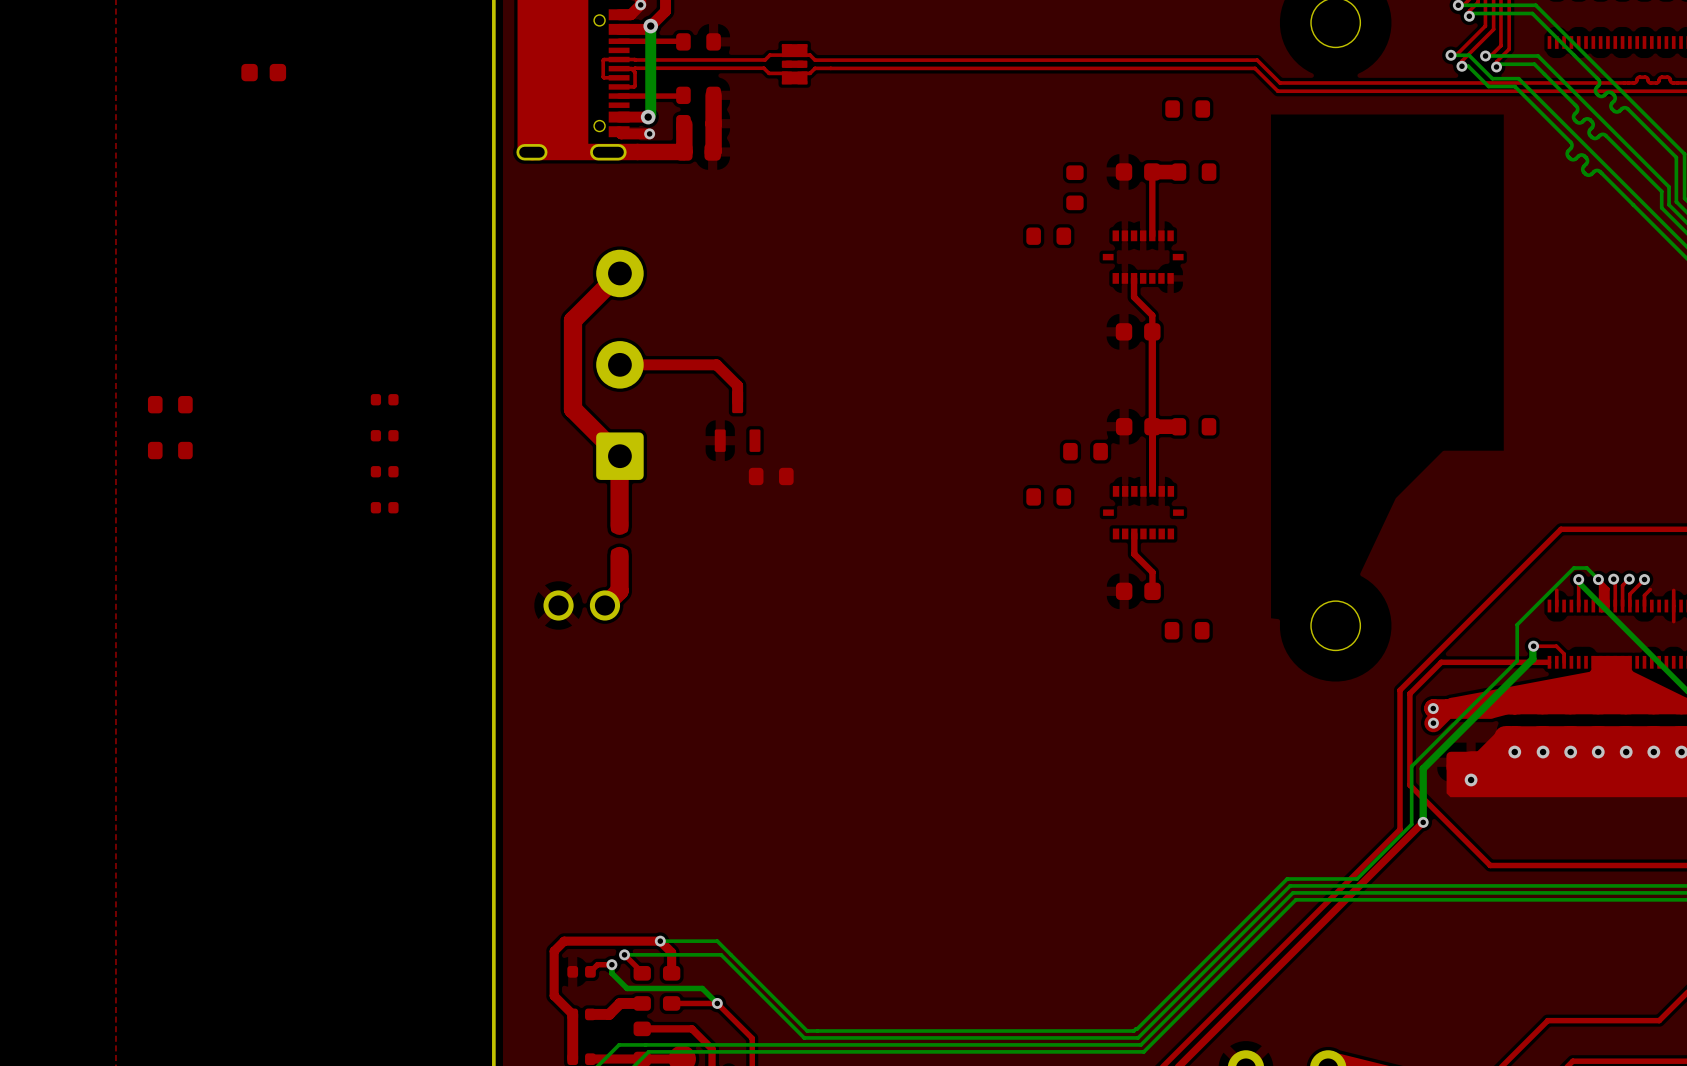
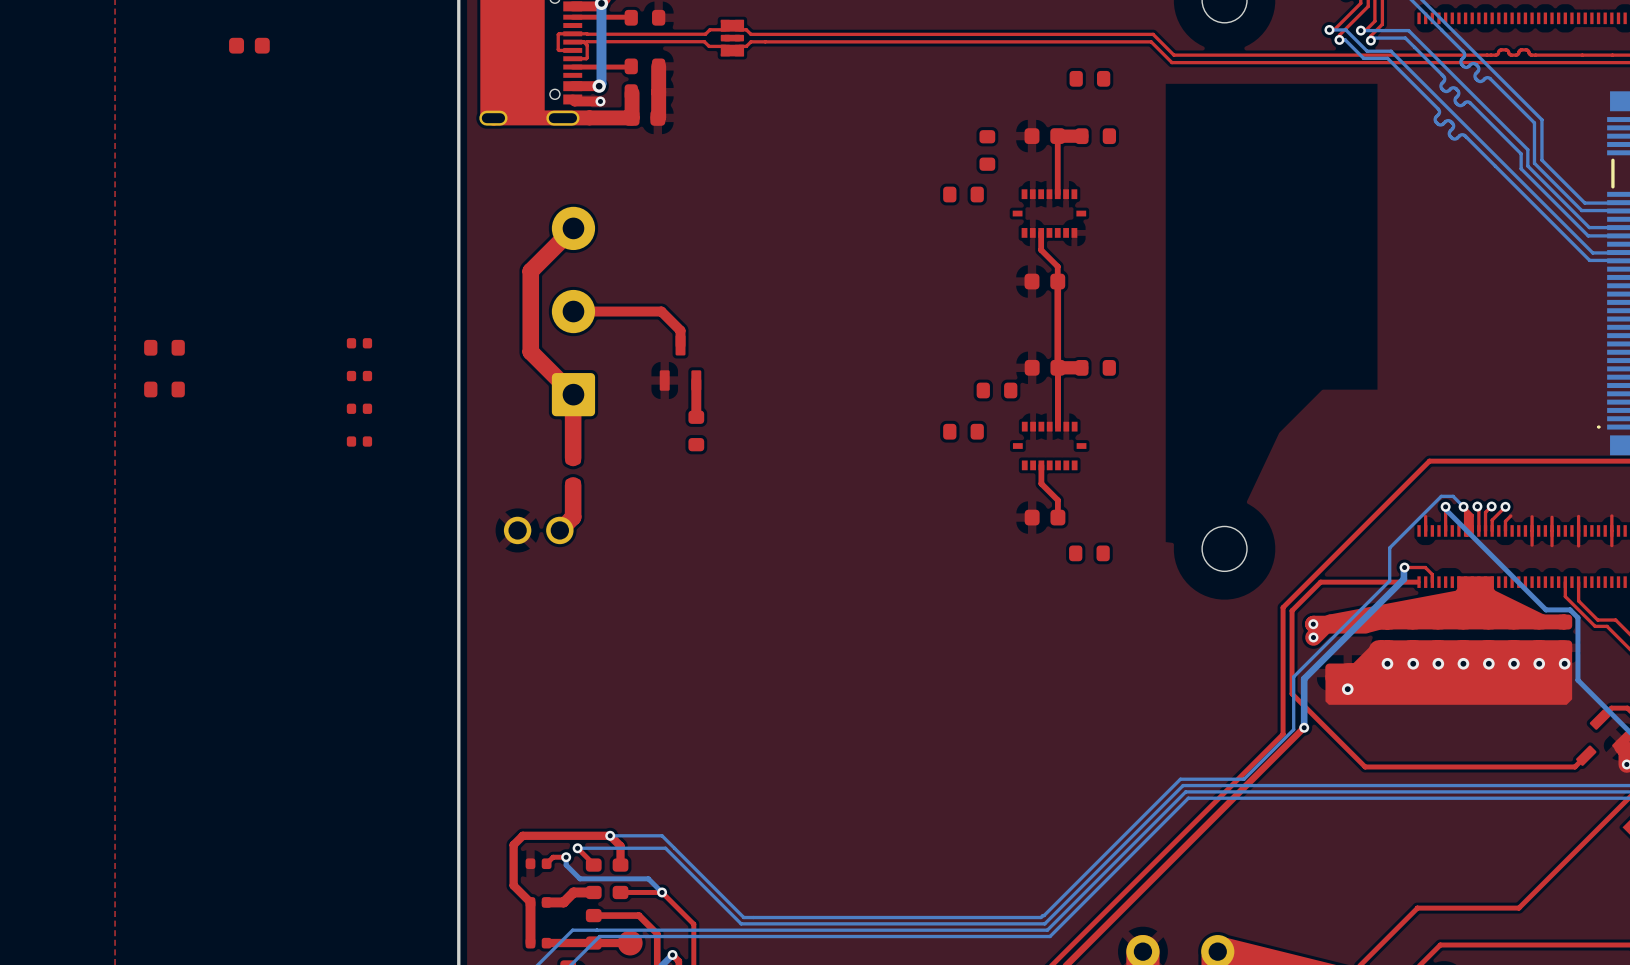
top track: none -> (696, 380) (696, 417)
part rotation: 0° (771, 476) -> 90° clockwise (696, 430)

